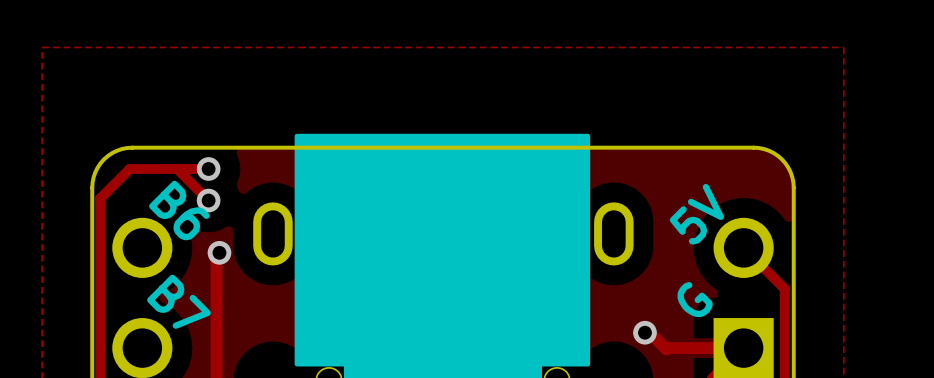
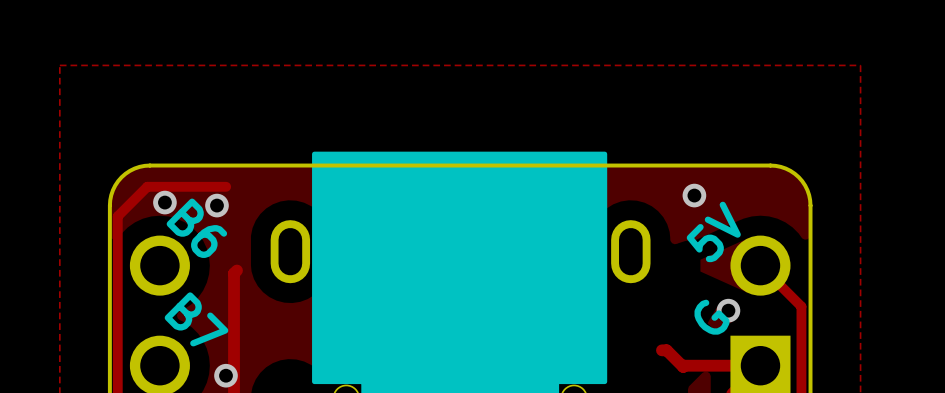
track: (177, 168) (208, 200) -> none
via: (208, 168) -> none
via: none -> (694, 195)
via: none -> (164, 202)
via: none -> (216, 205)
via: (208, 200) -> none
via: (219, 252) -> none
via: none -> (728, 310)
via: (644, 332) -> none
via: none -> (225, 375)

